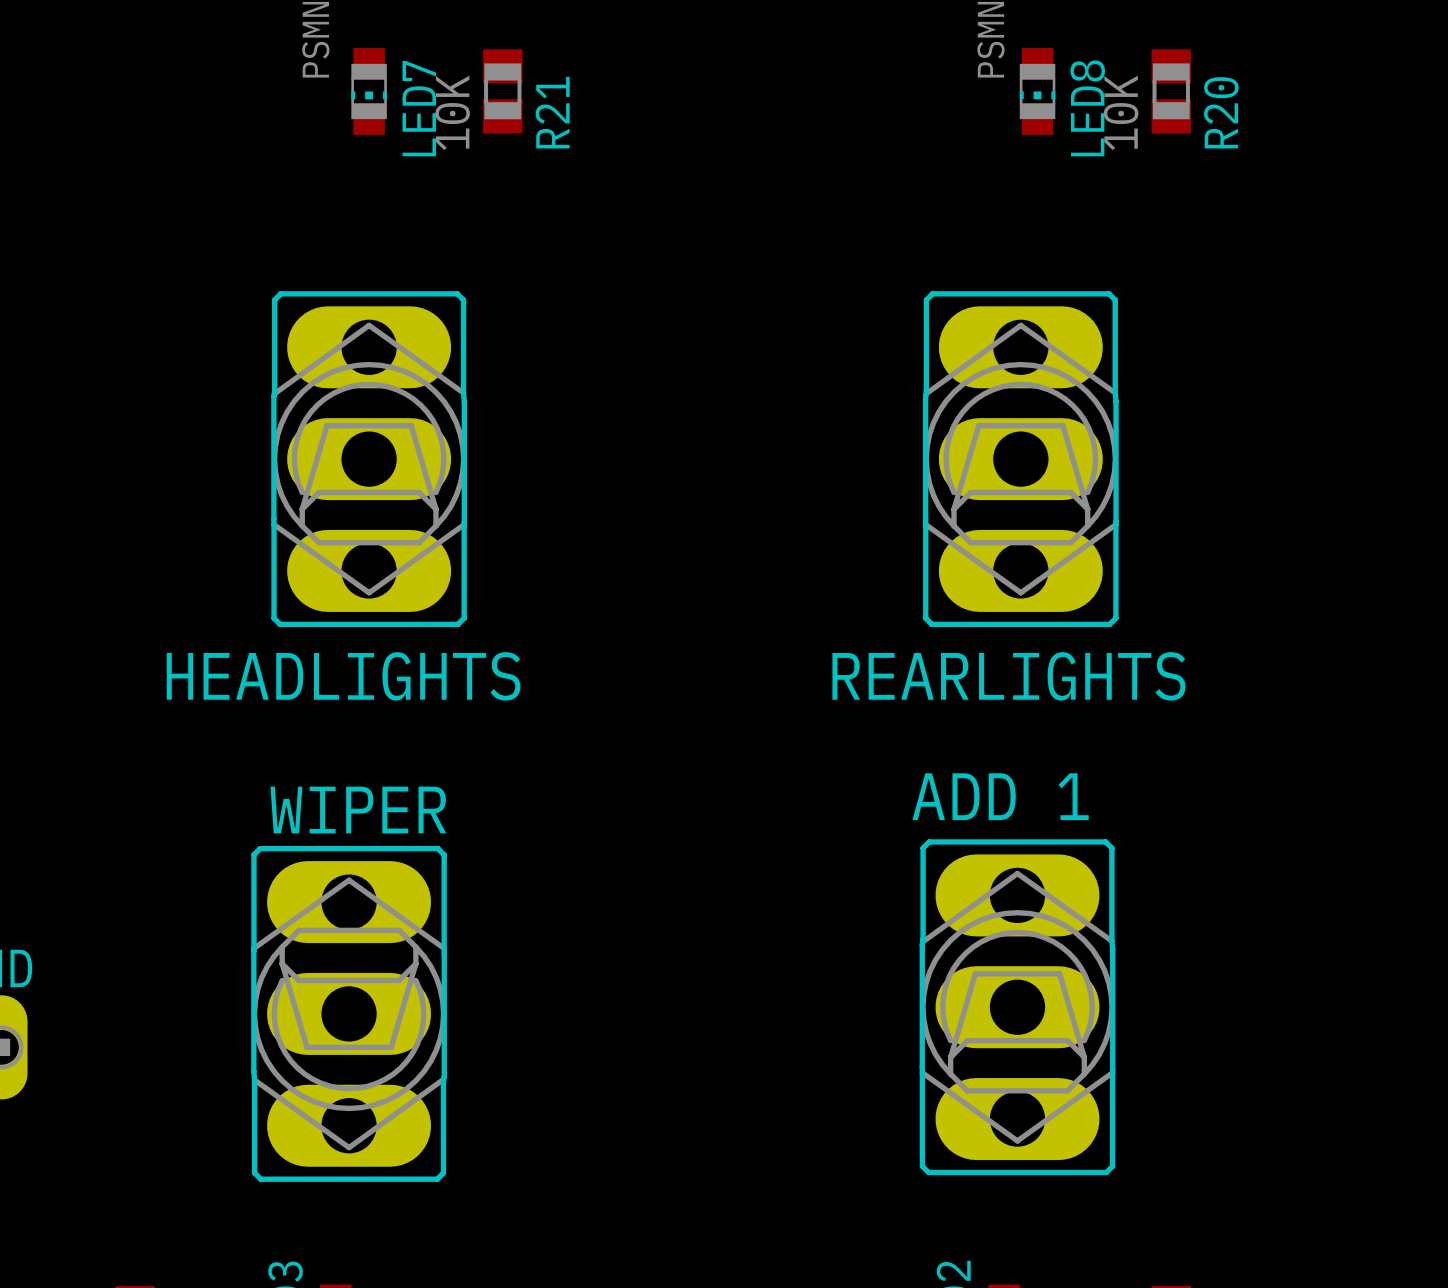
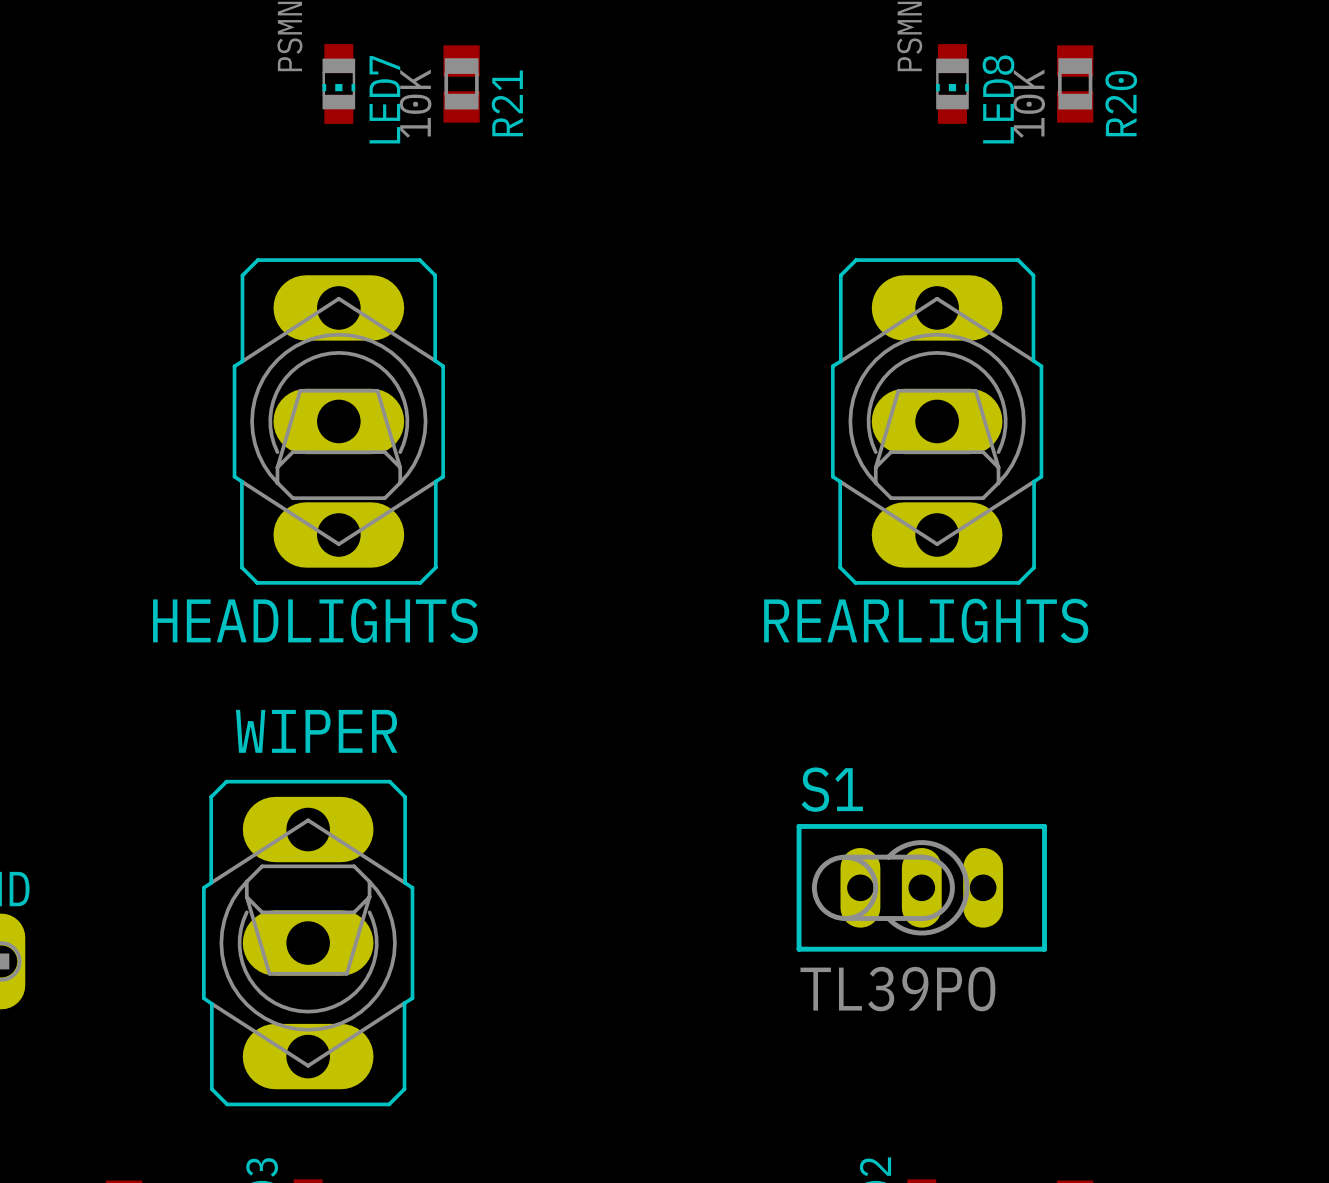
HEADLIGHTS footprint: [271, 291, 467, 628] -> [232, 258, 446, 585]
REARLIGHTS footprint: [922, 291, 1119, 628] -> [830, 258, 1044, 585]
text: ADD 1 (1000, 796) -> none
WIPER footprint: [251, 845, 447, 1182] -> [202, 779, 415, 1107]
S1: none -> TL39PO (921, 887)
part: (1017, 1007) -> none

